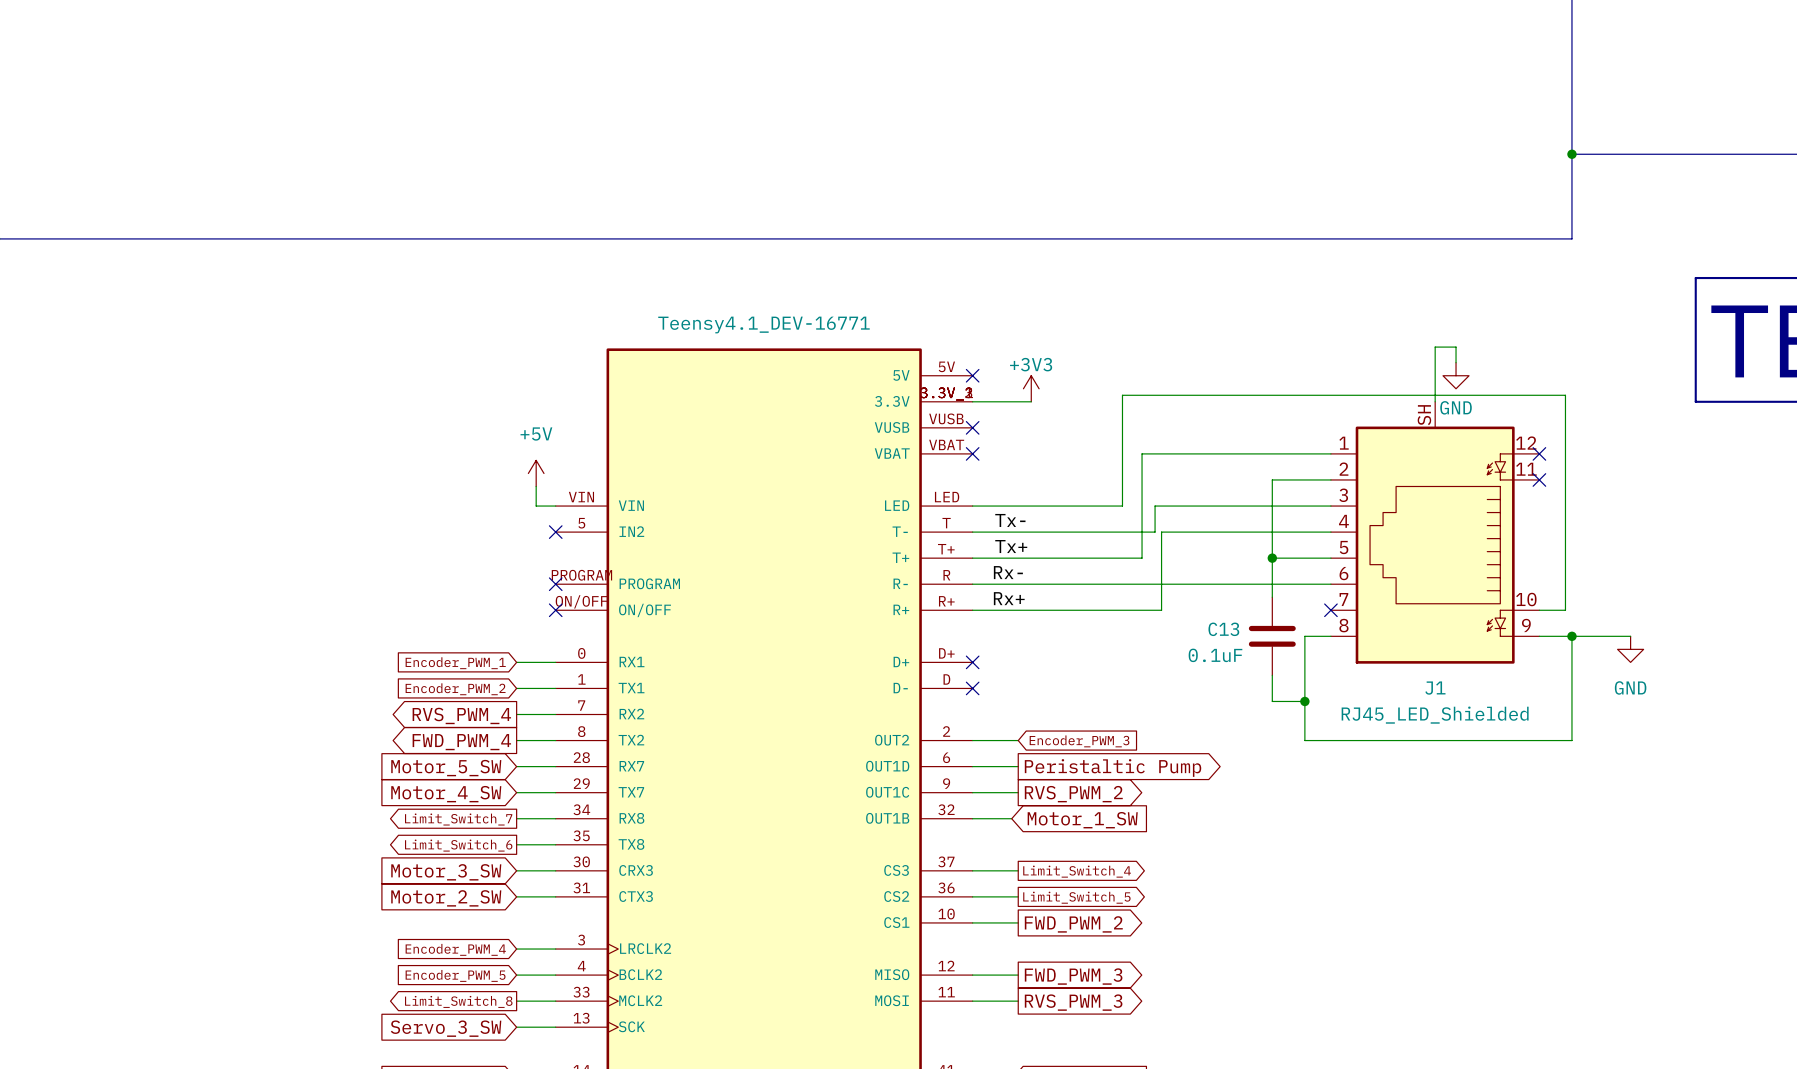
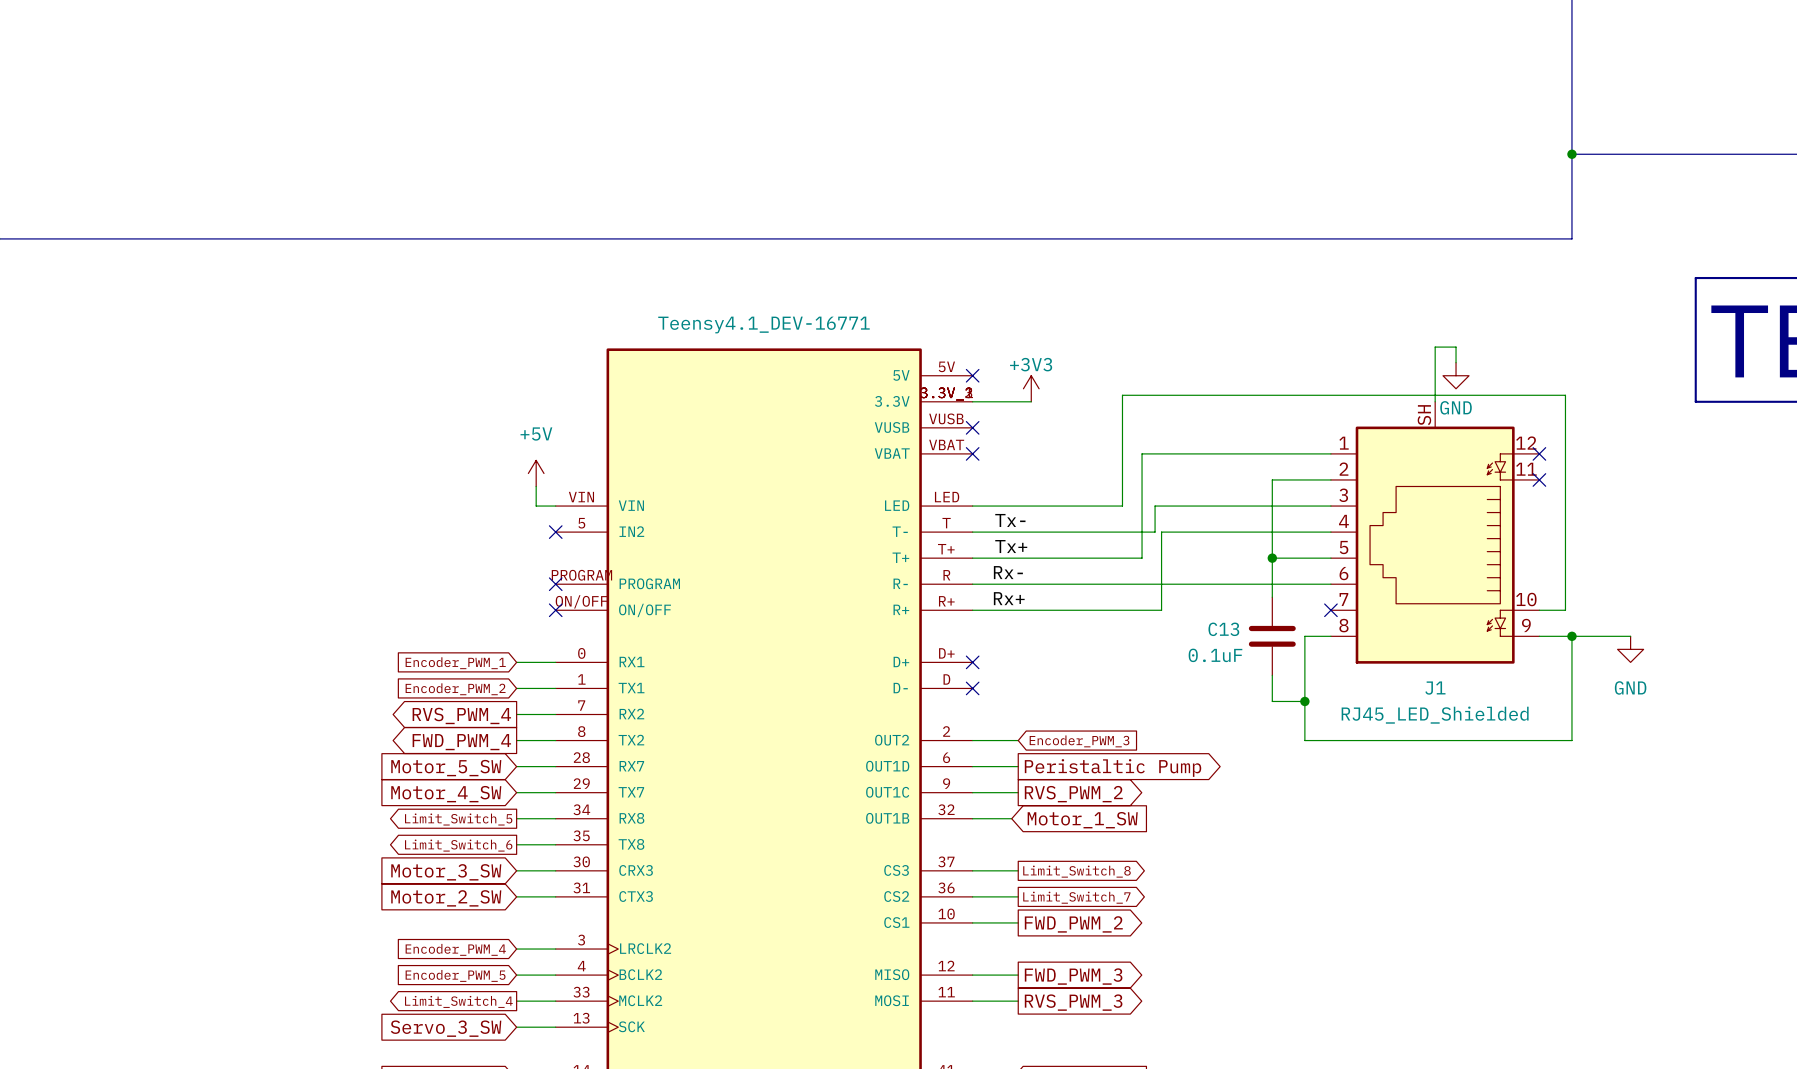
global label: Limit_Switch_7 (458, 819) -> Limit_Switch_5 (458, 819)
global label: Limit_Switch_4 (1077, 871) -> Limit_Switch_8 (1076, 871)
global label: Limit_Switch_5 (1076, 897) -> Limit_Switch_7 (1076, 897)
global label: Limit_Switch_8 (458, 1001) -> Limit_Switch_4 (458, 1001)

